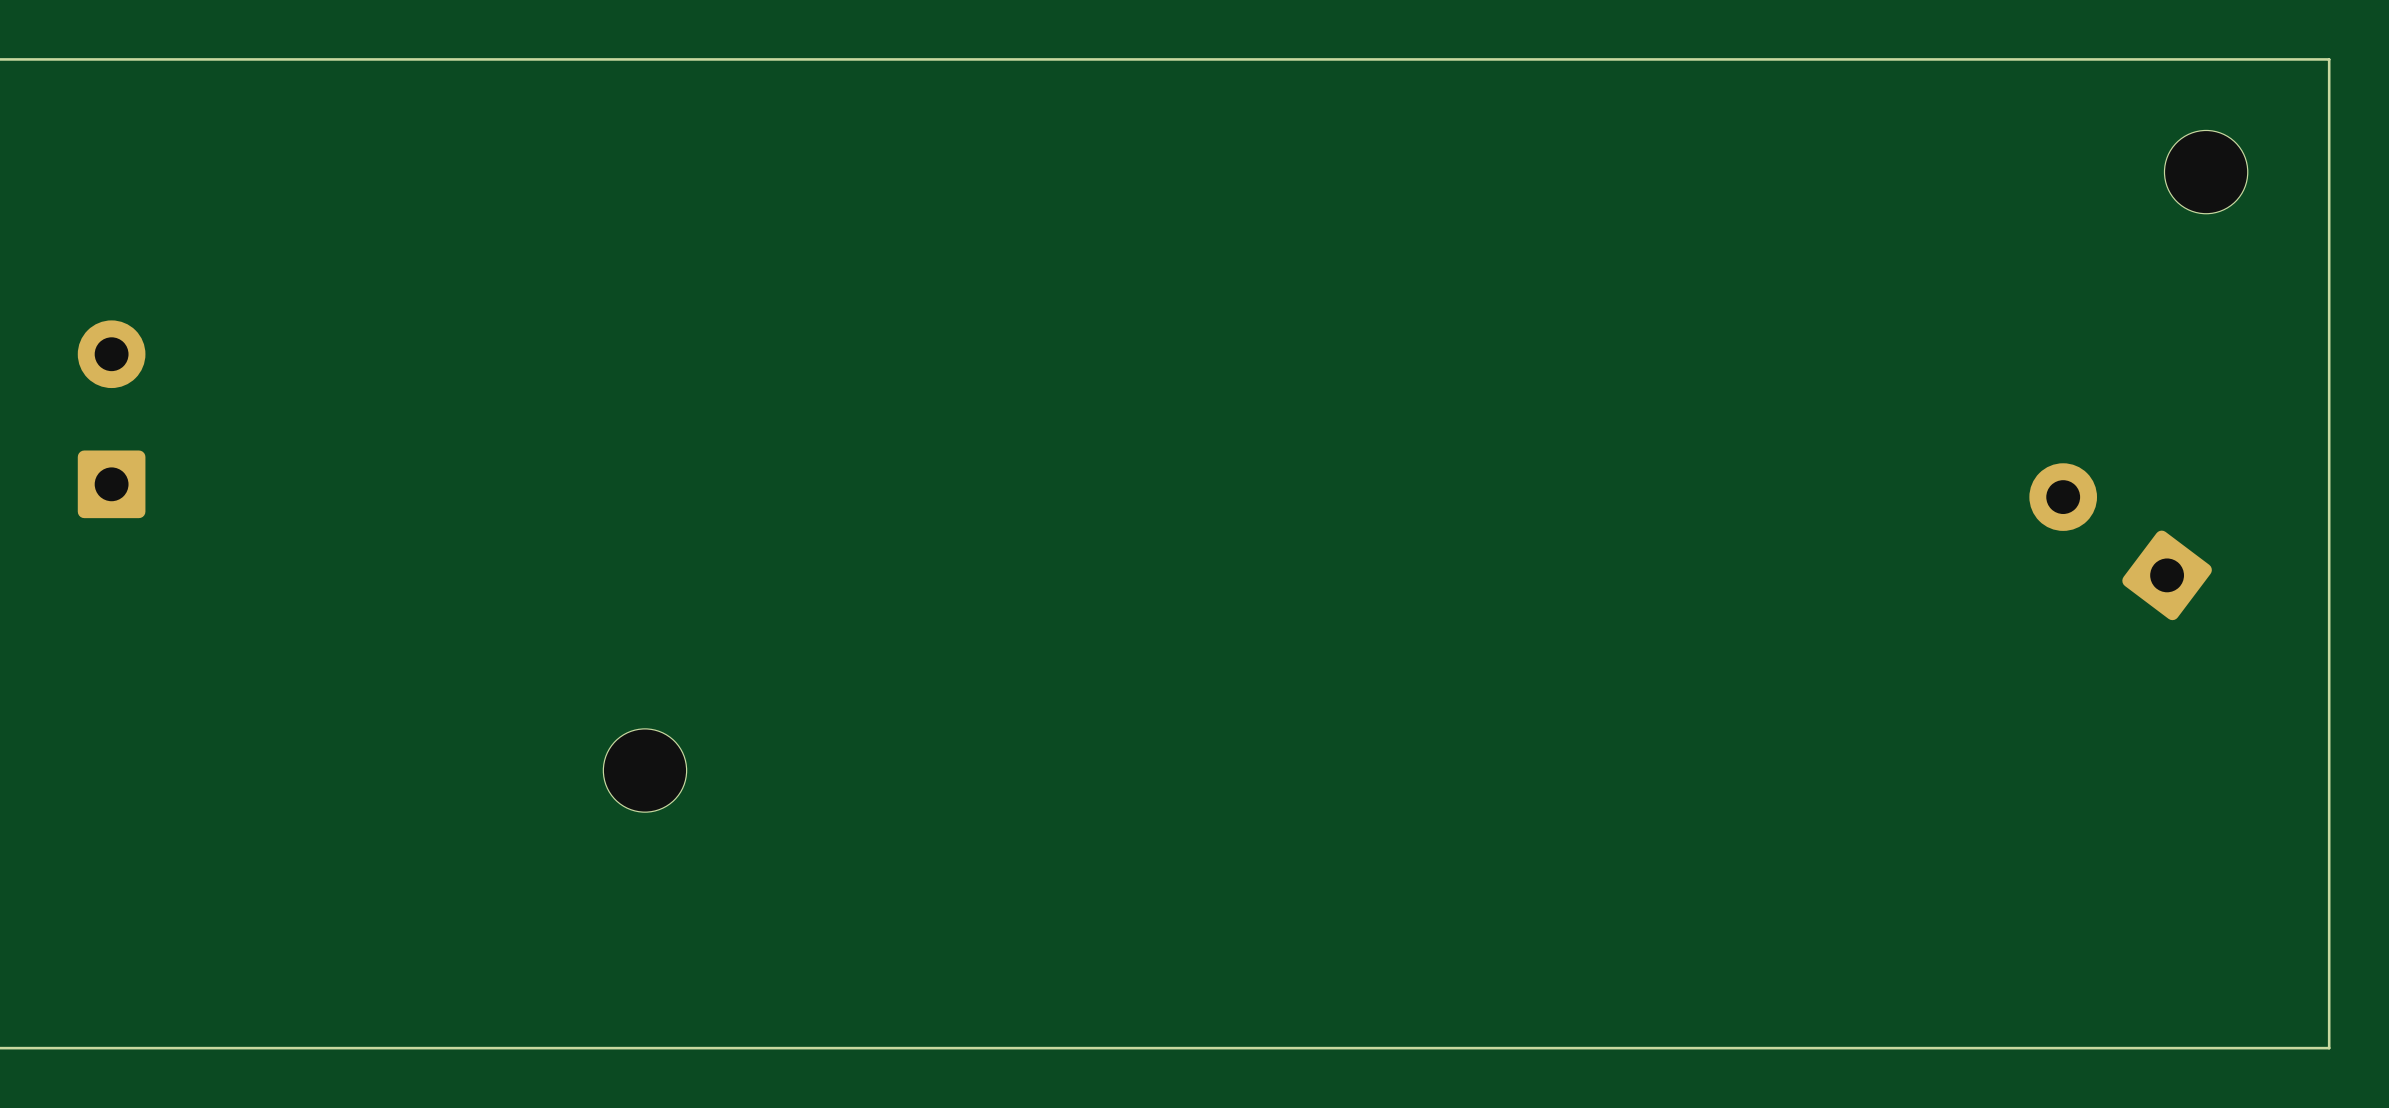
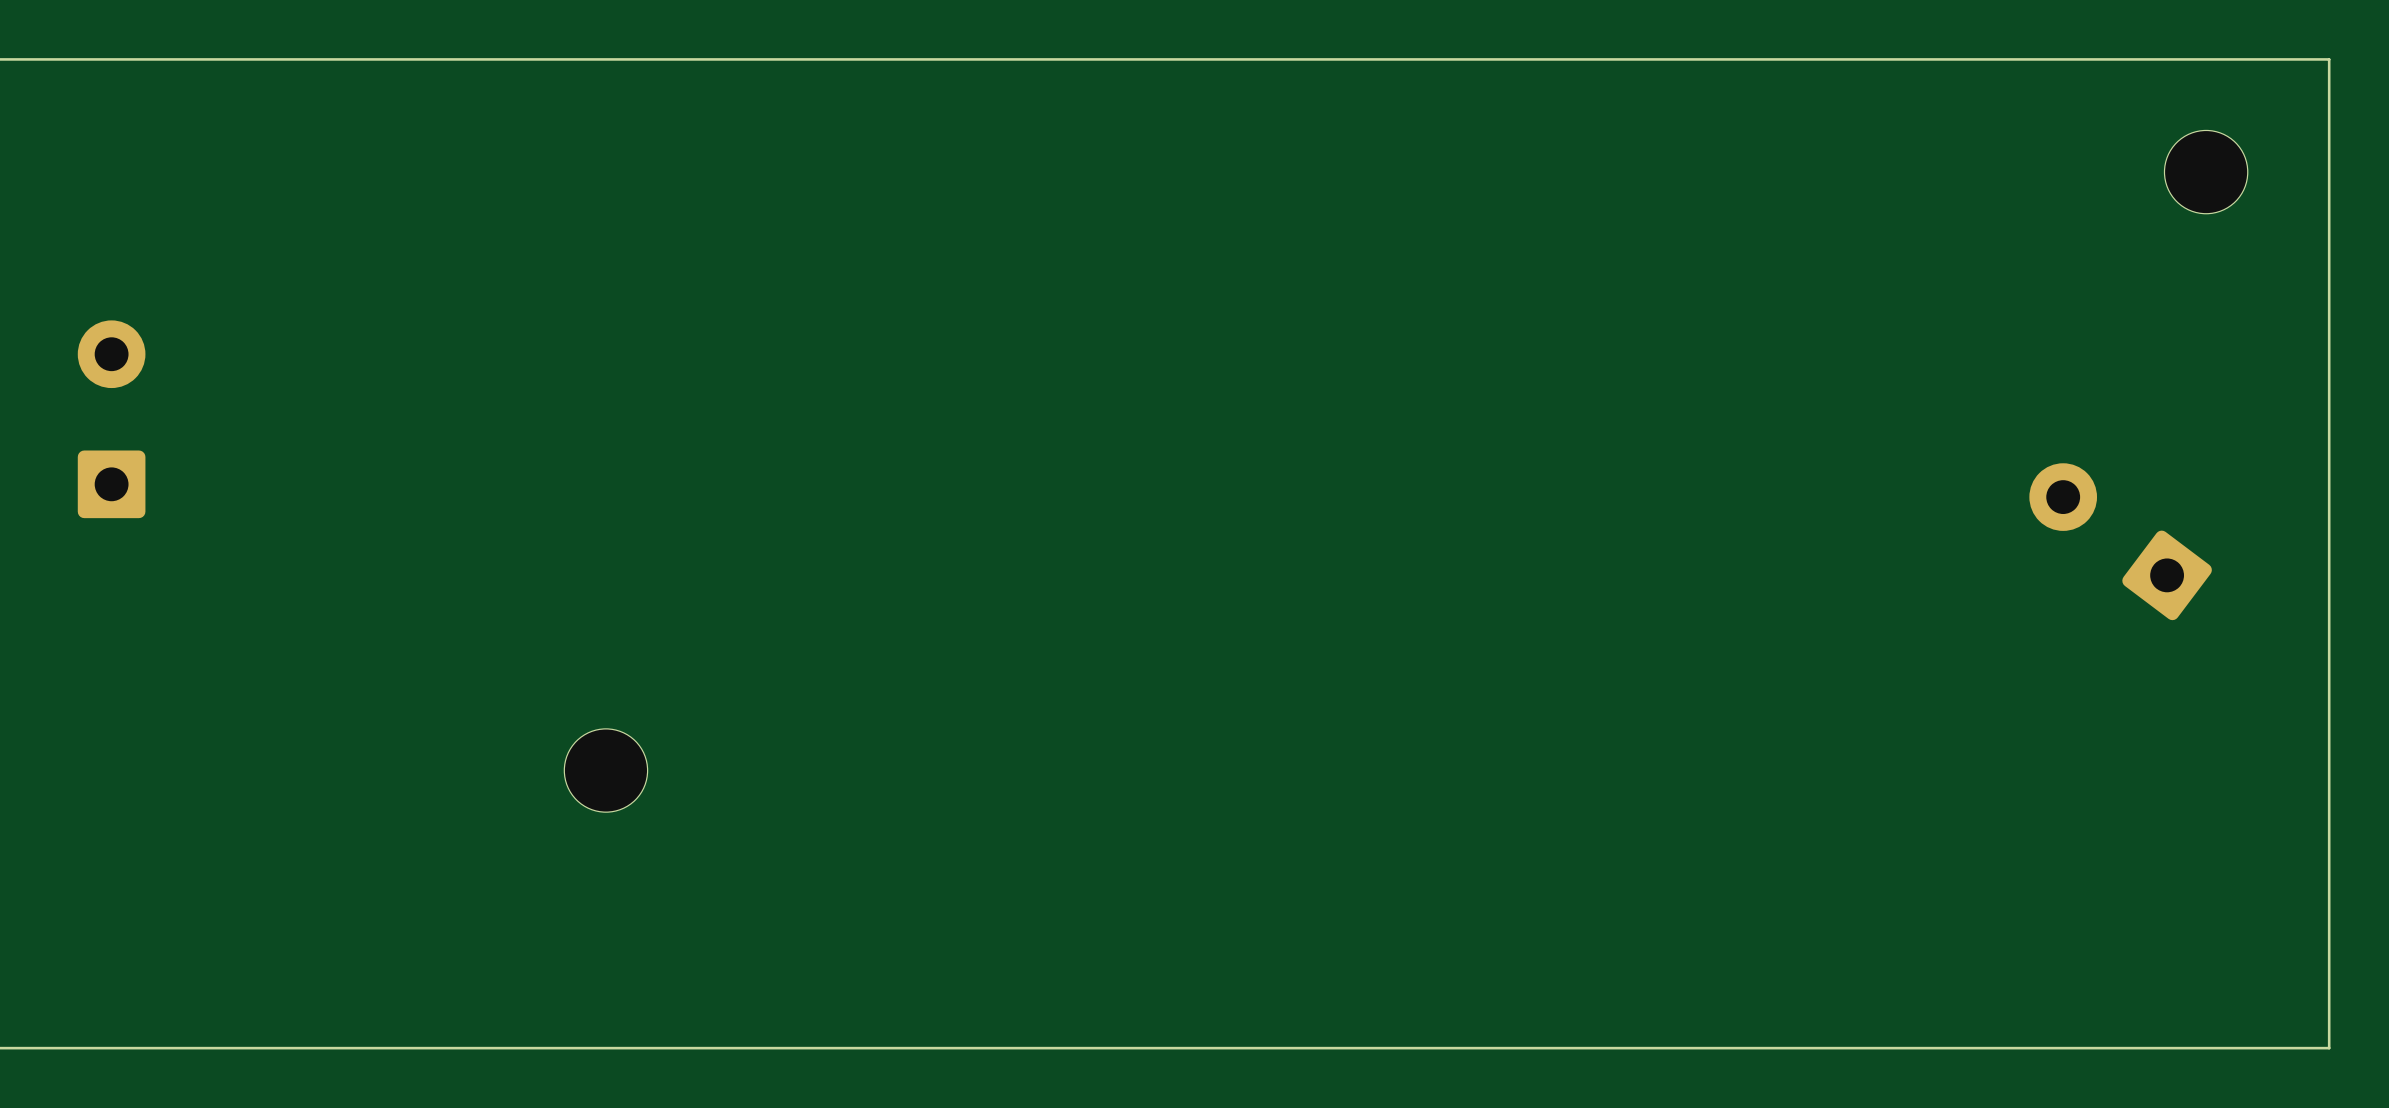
part position: (644, 770) -> (605, 770)

